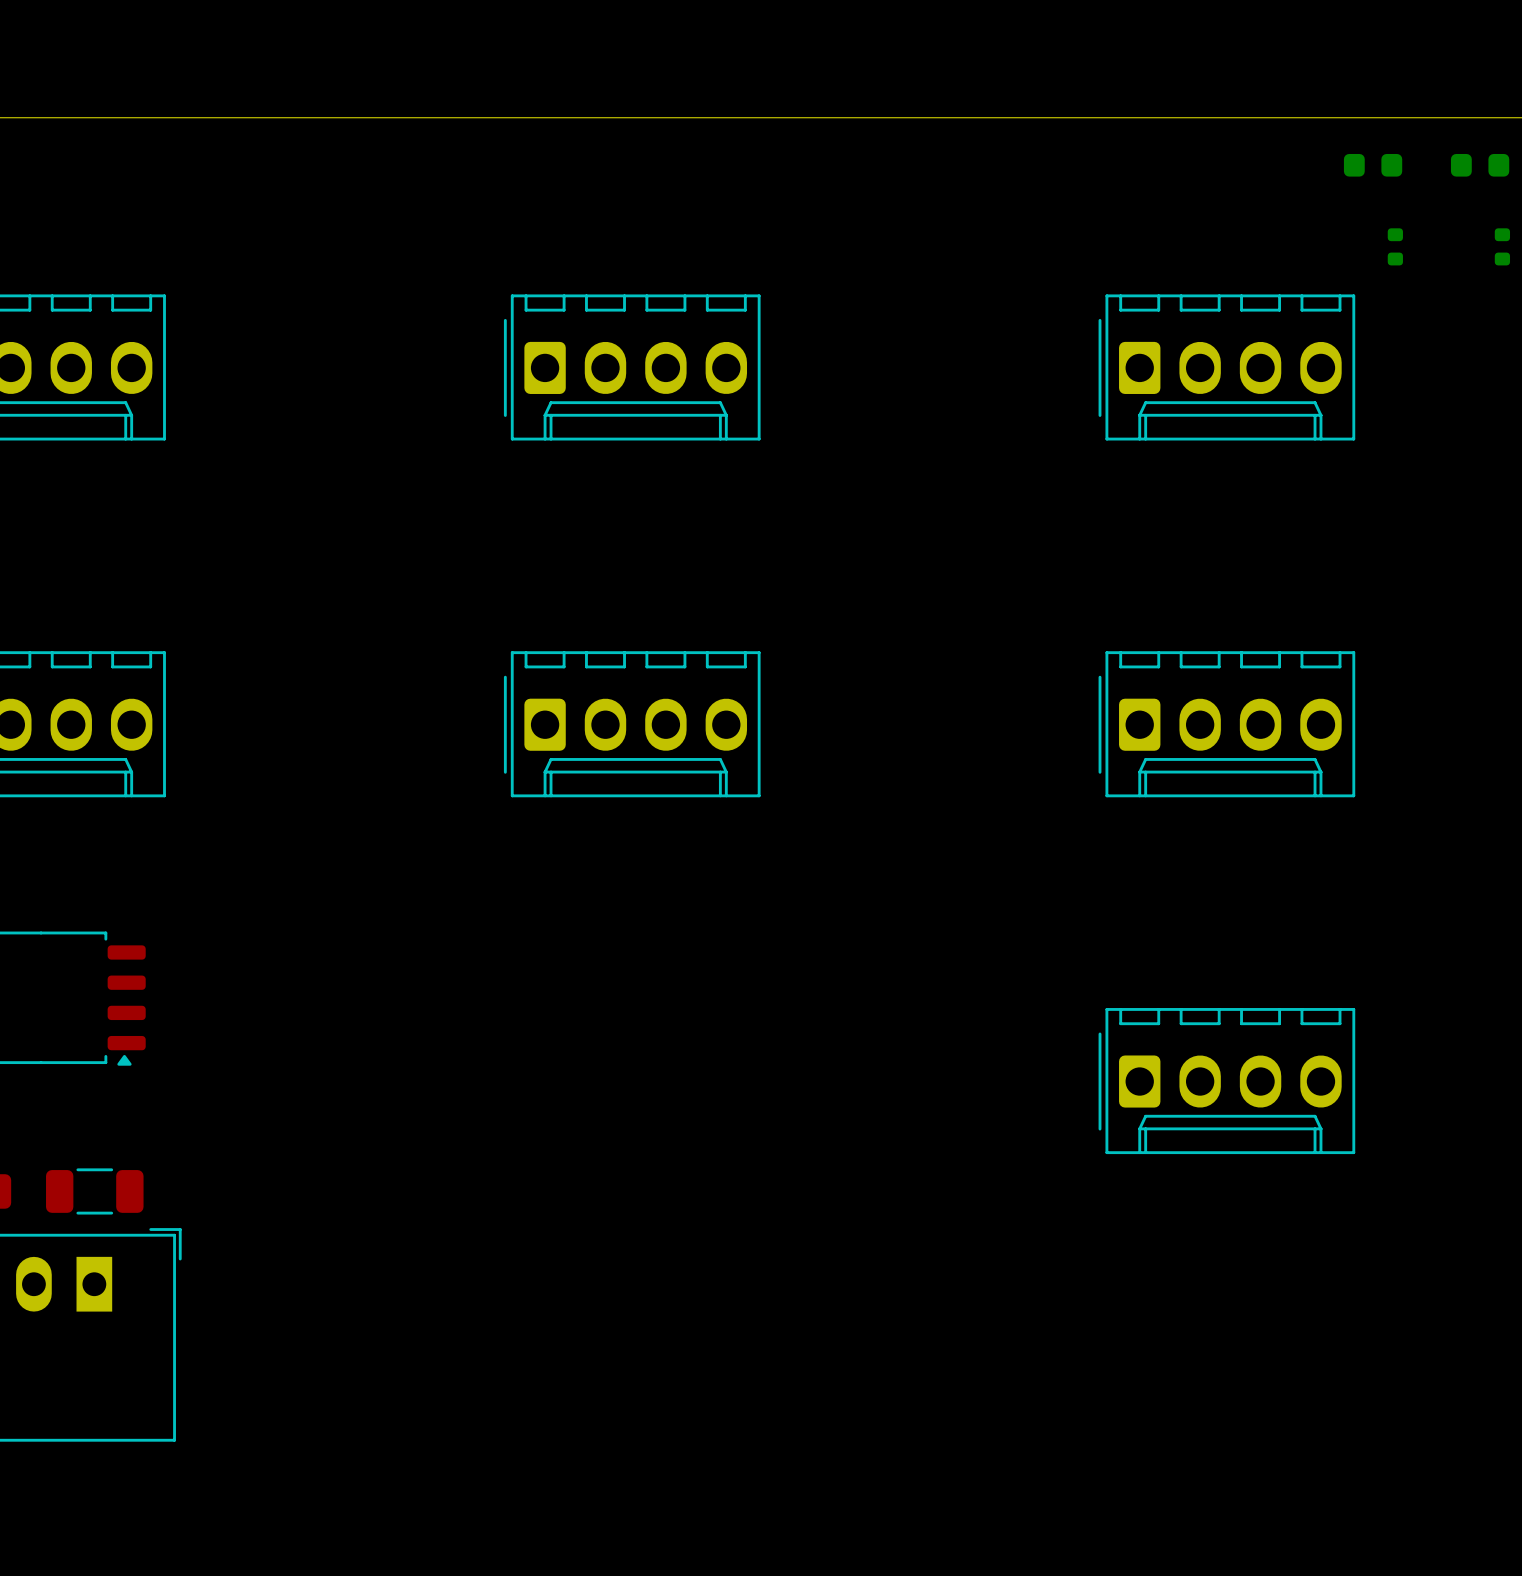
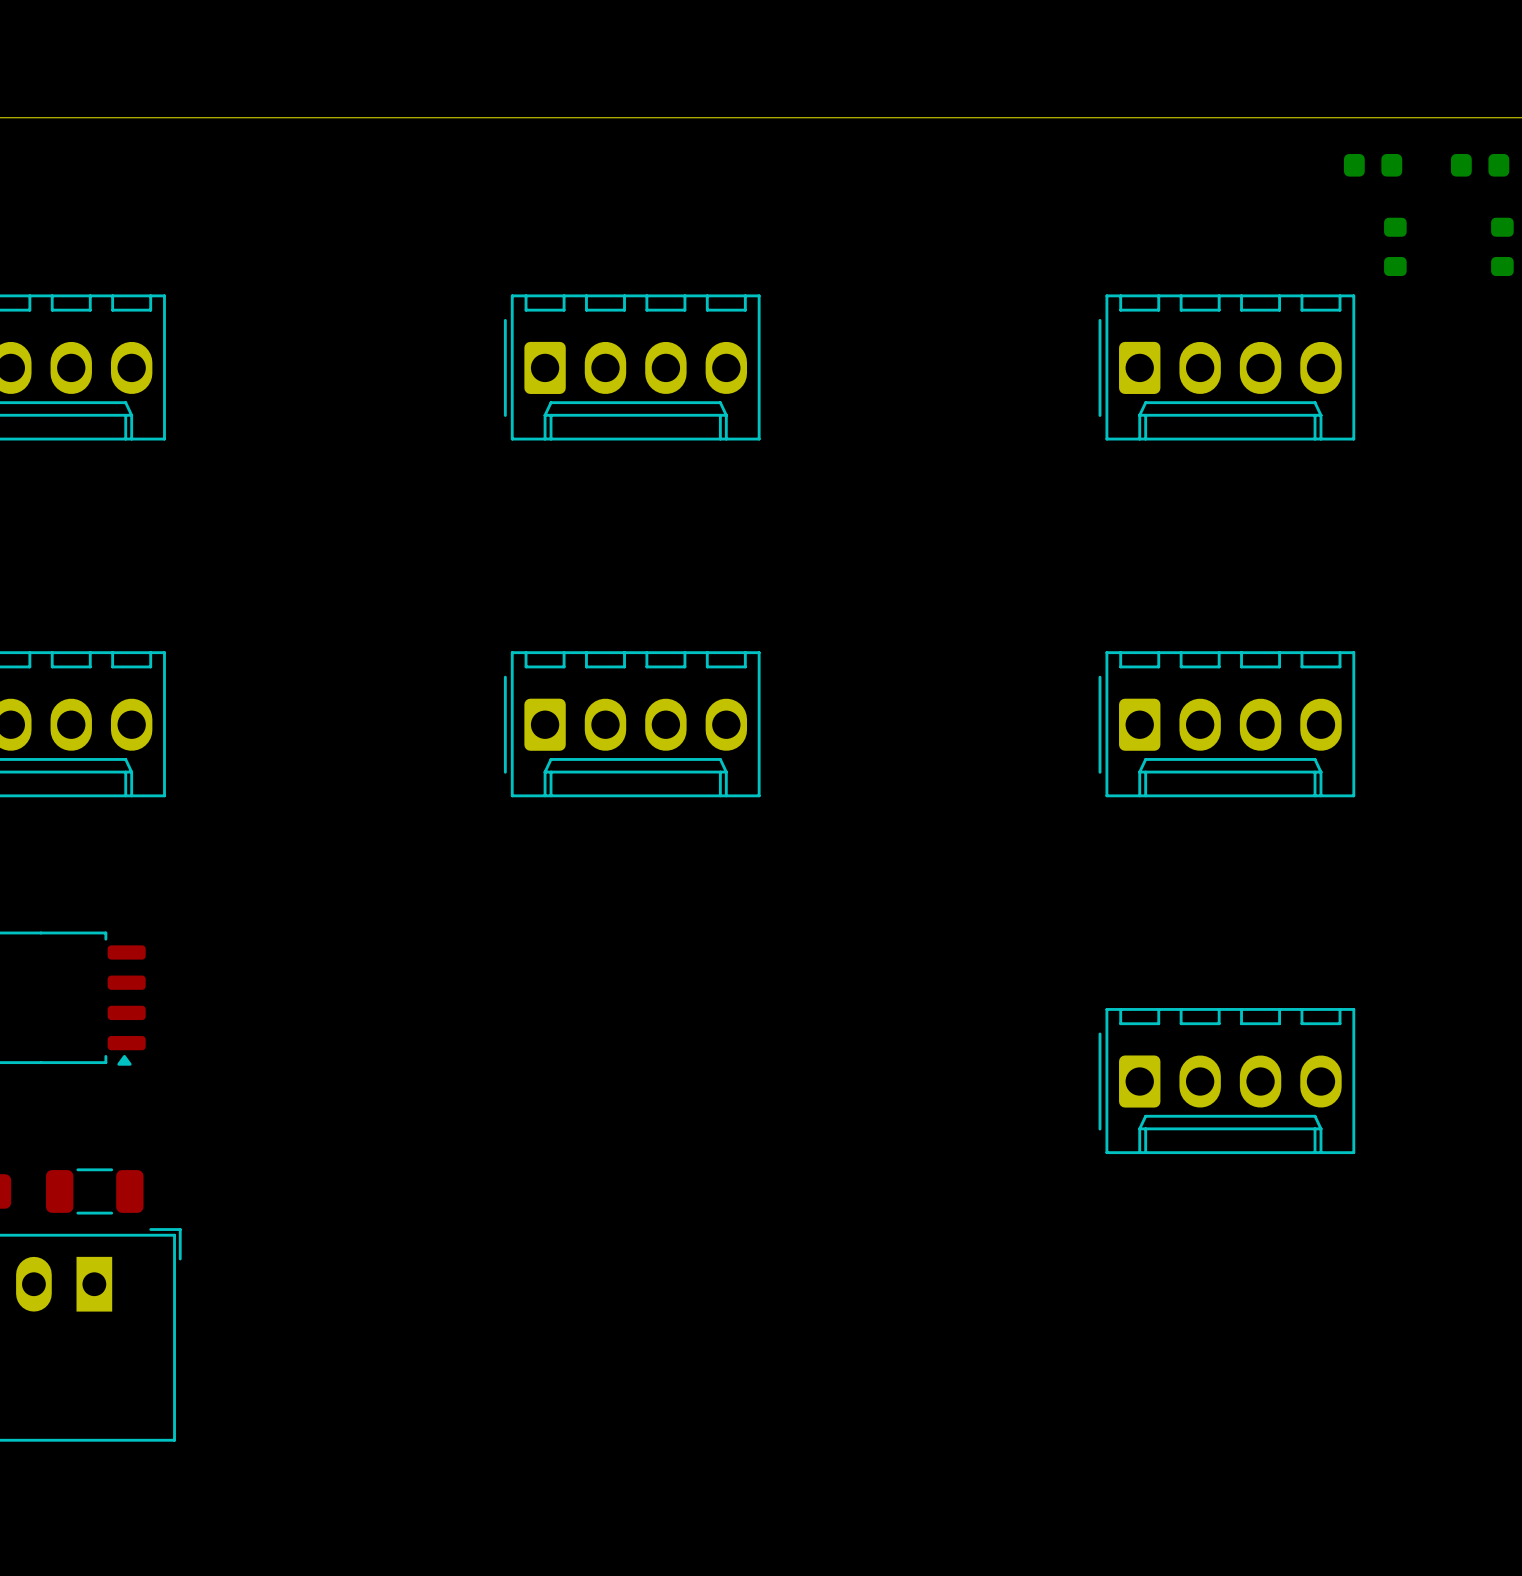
part footprint: [1387, 228, 1403, 266] -> [1384, 217, 1407, 277]
part footprint: [1494, 228, 1511, 266] -> [1491, 217, 1514, 277]

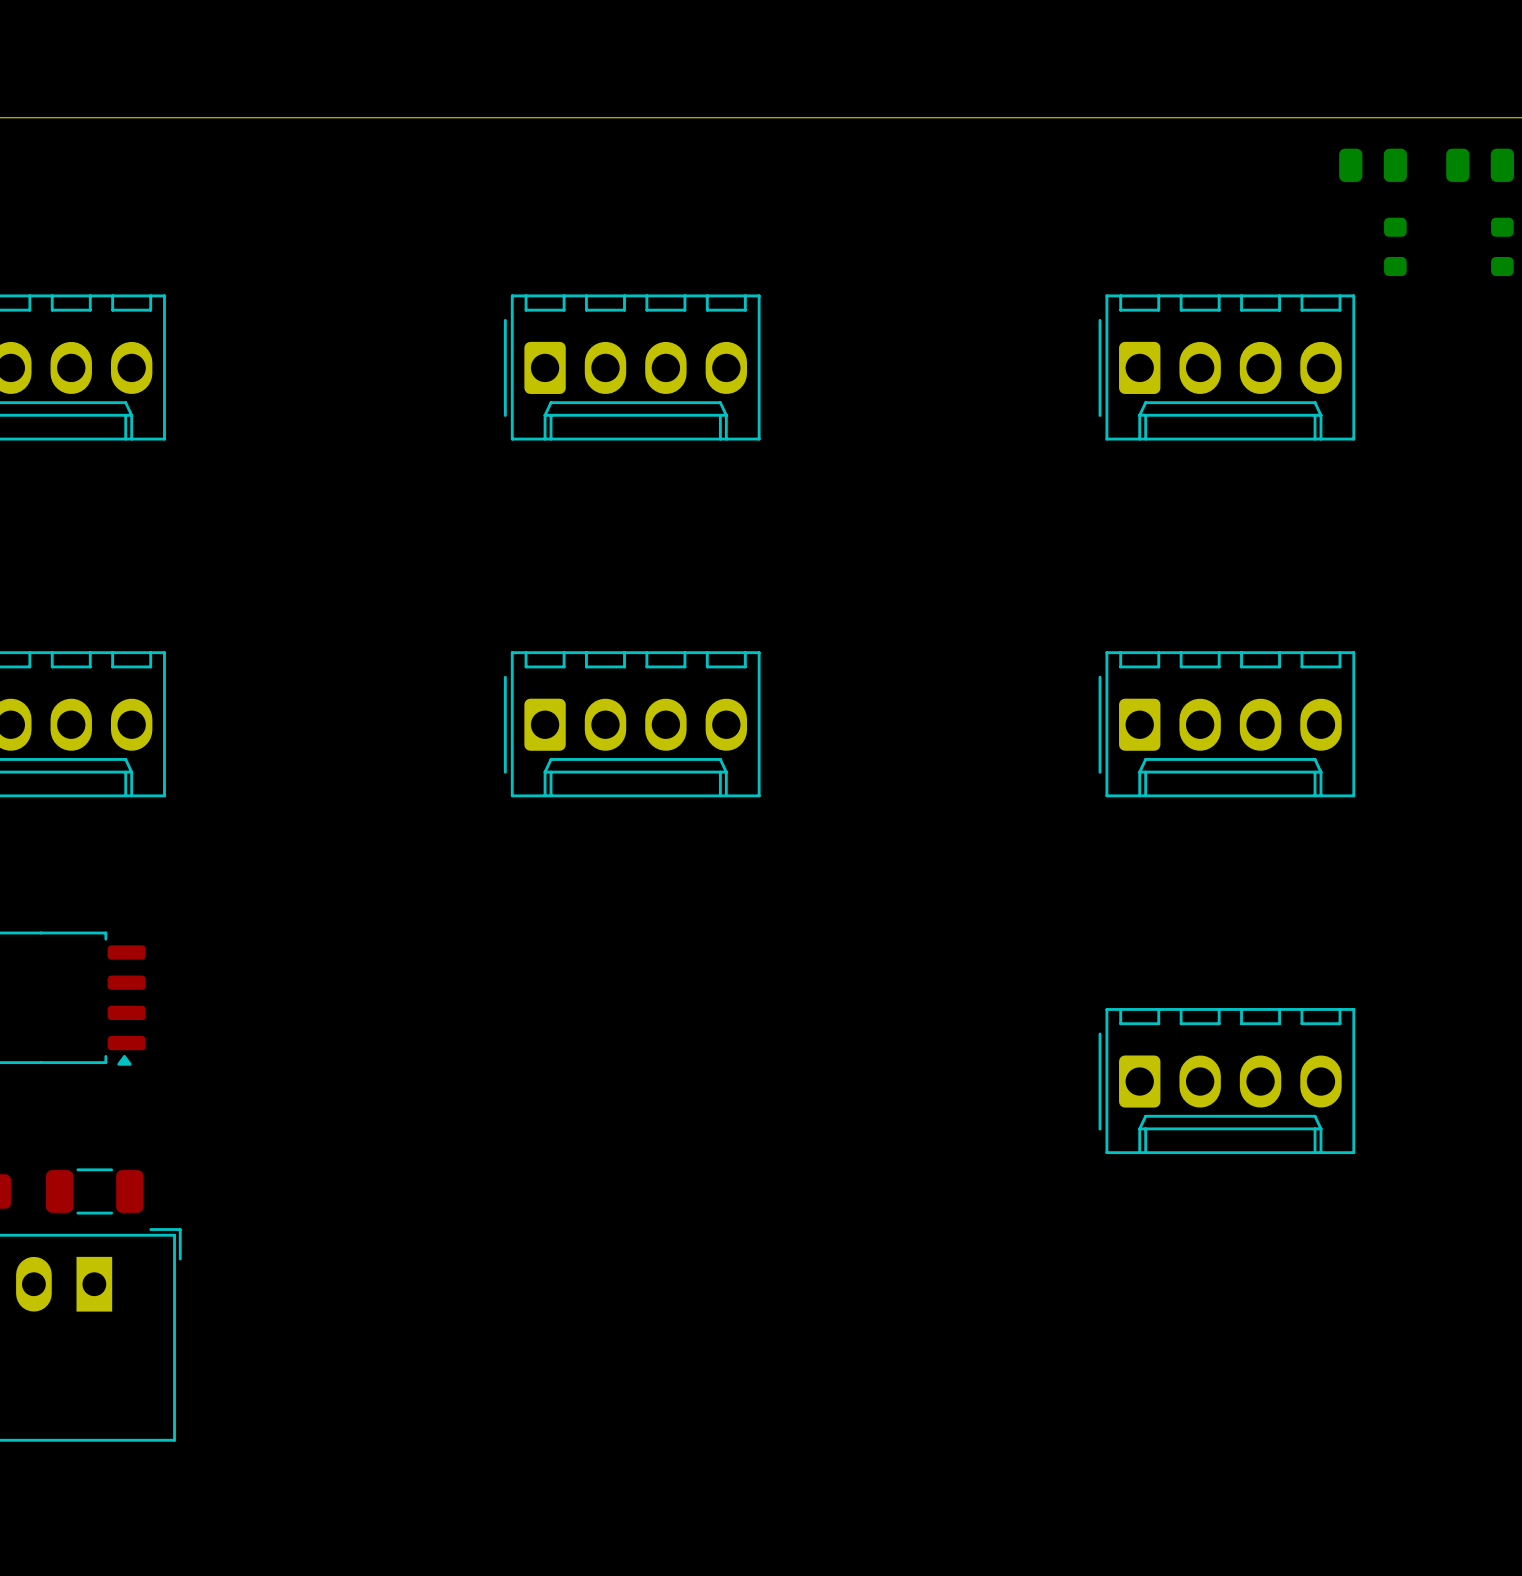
part footprint: [1343, 153, 1403, 177] -> [1339, 148, 1407, 182]
part footprint: [1450, 153, 1510, 177] -> [1446, 148, 1515, 182]

